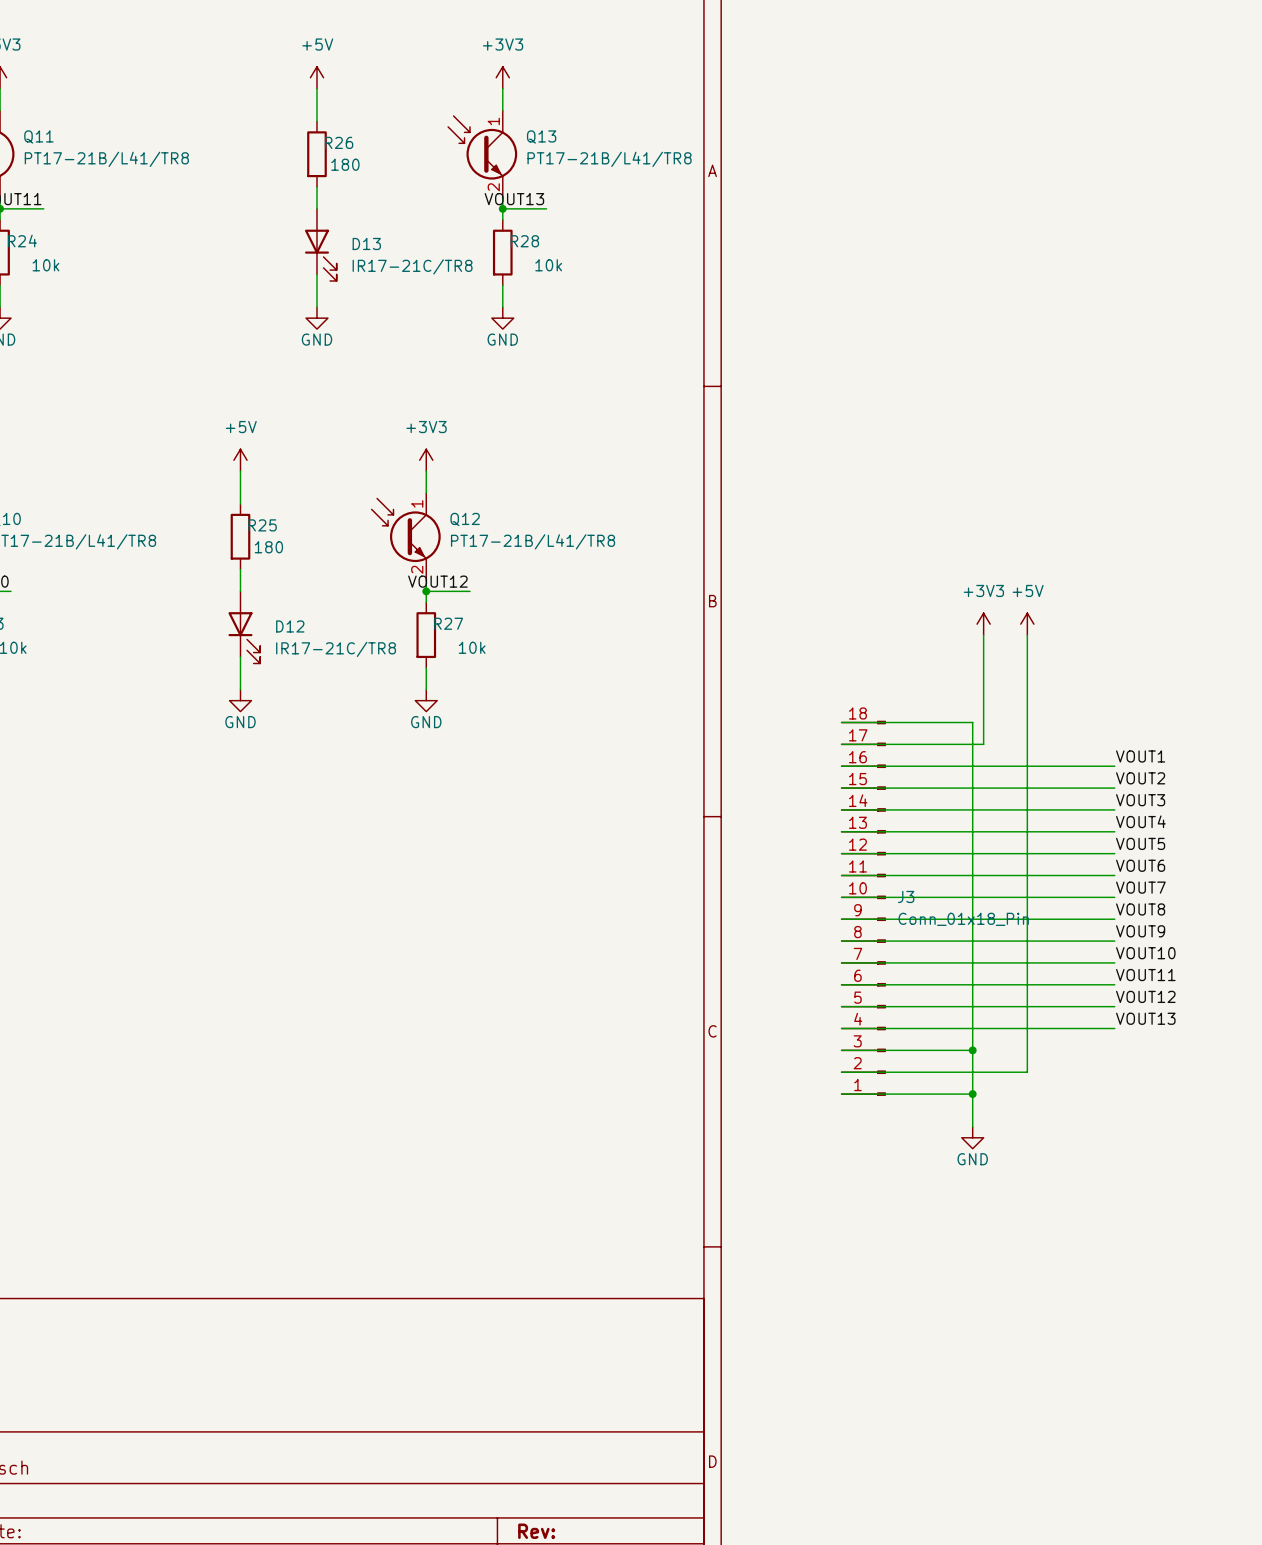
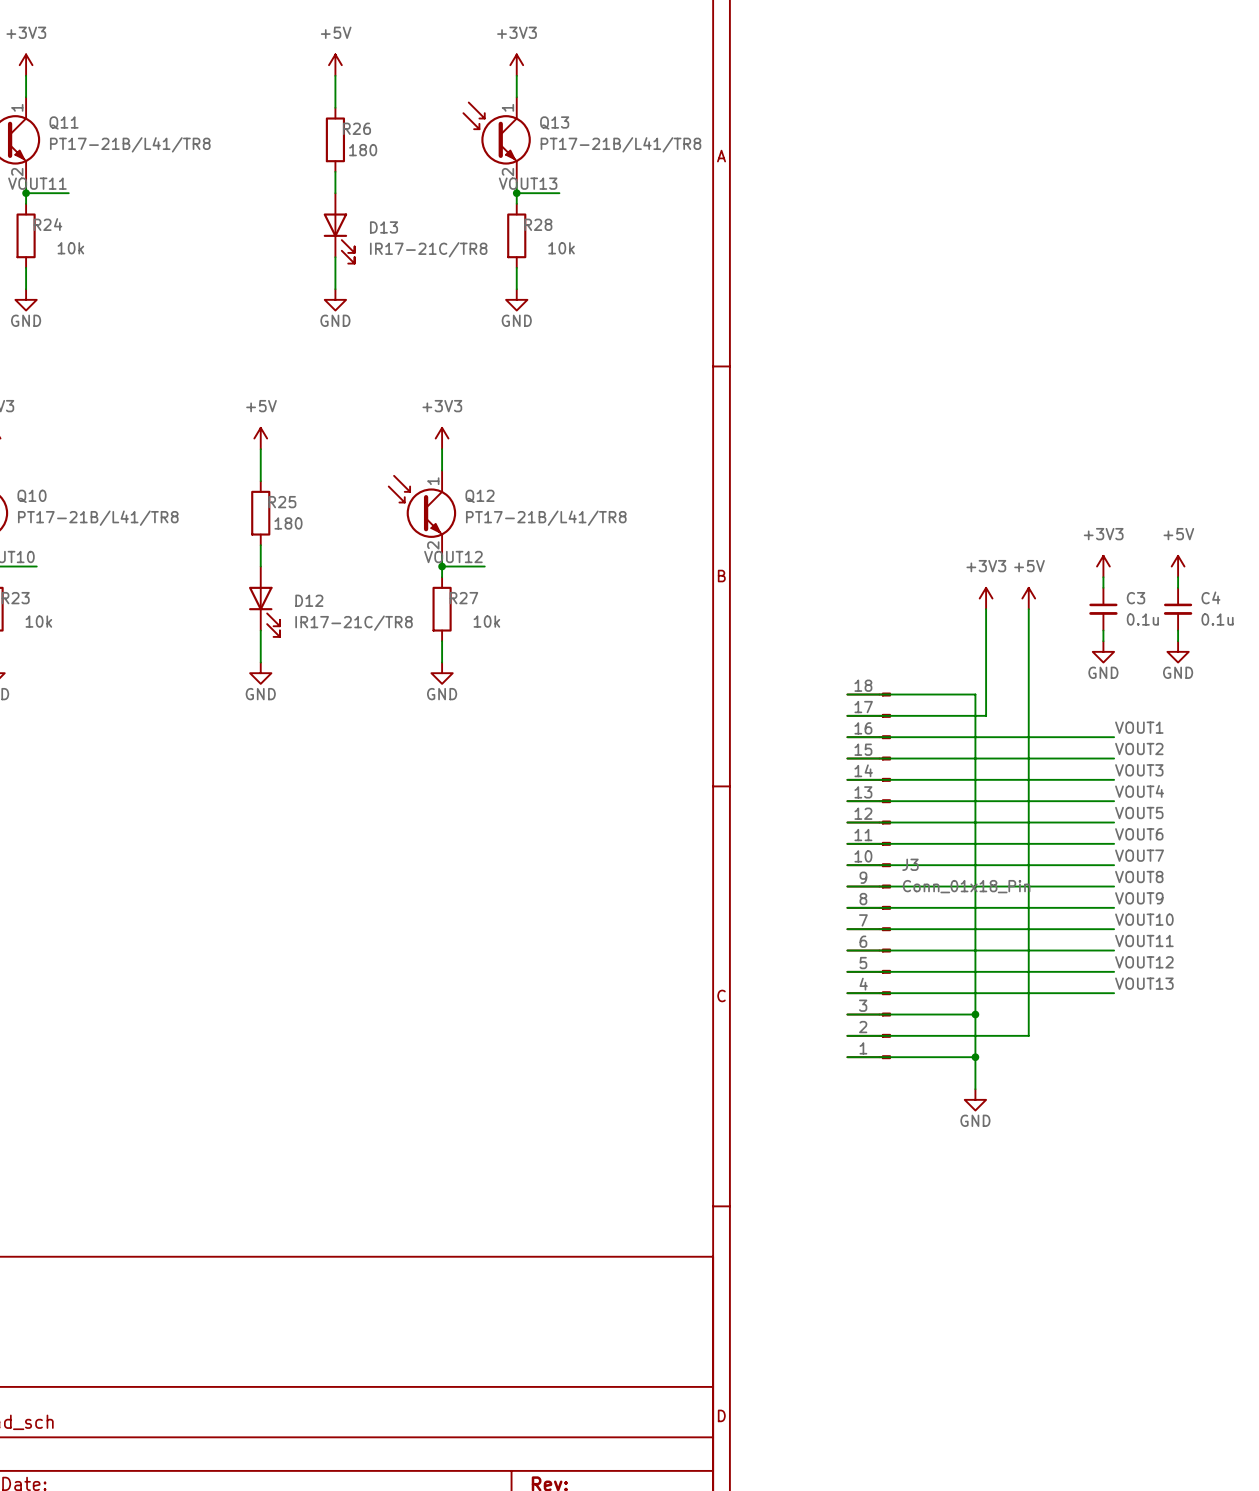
power symbol: none -> +3V3 (1103, 566)
power symbol: none -> +5V (1178, 566)
wire: none -> (1103, 577) (1103, 587)
wire: none -> (1178, 577) (1178, 587)
C3: none -> 0.1u (1103, 609)
C4: none -> 0.1u (1178, 609)
wire: none -> (1103, 630) (1103, 641)
wire: none -> (1178, 630) (1178, 641)
power symbol: none -> GND (1103, 651)
power symbol: none -> GND (1178, 651)

